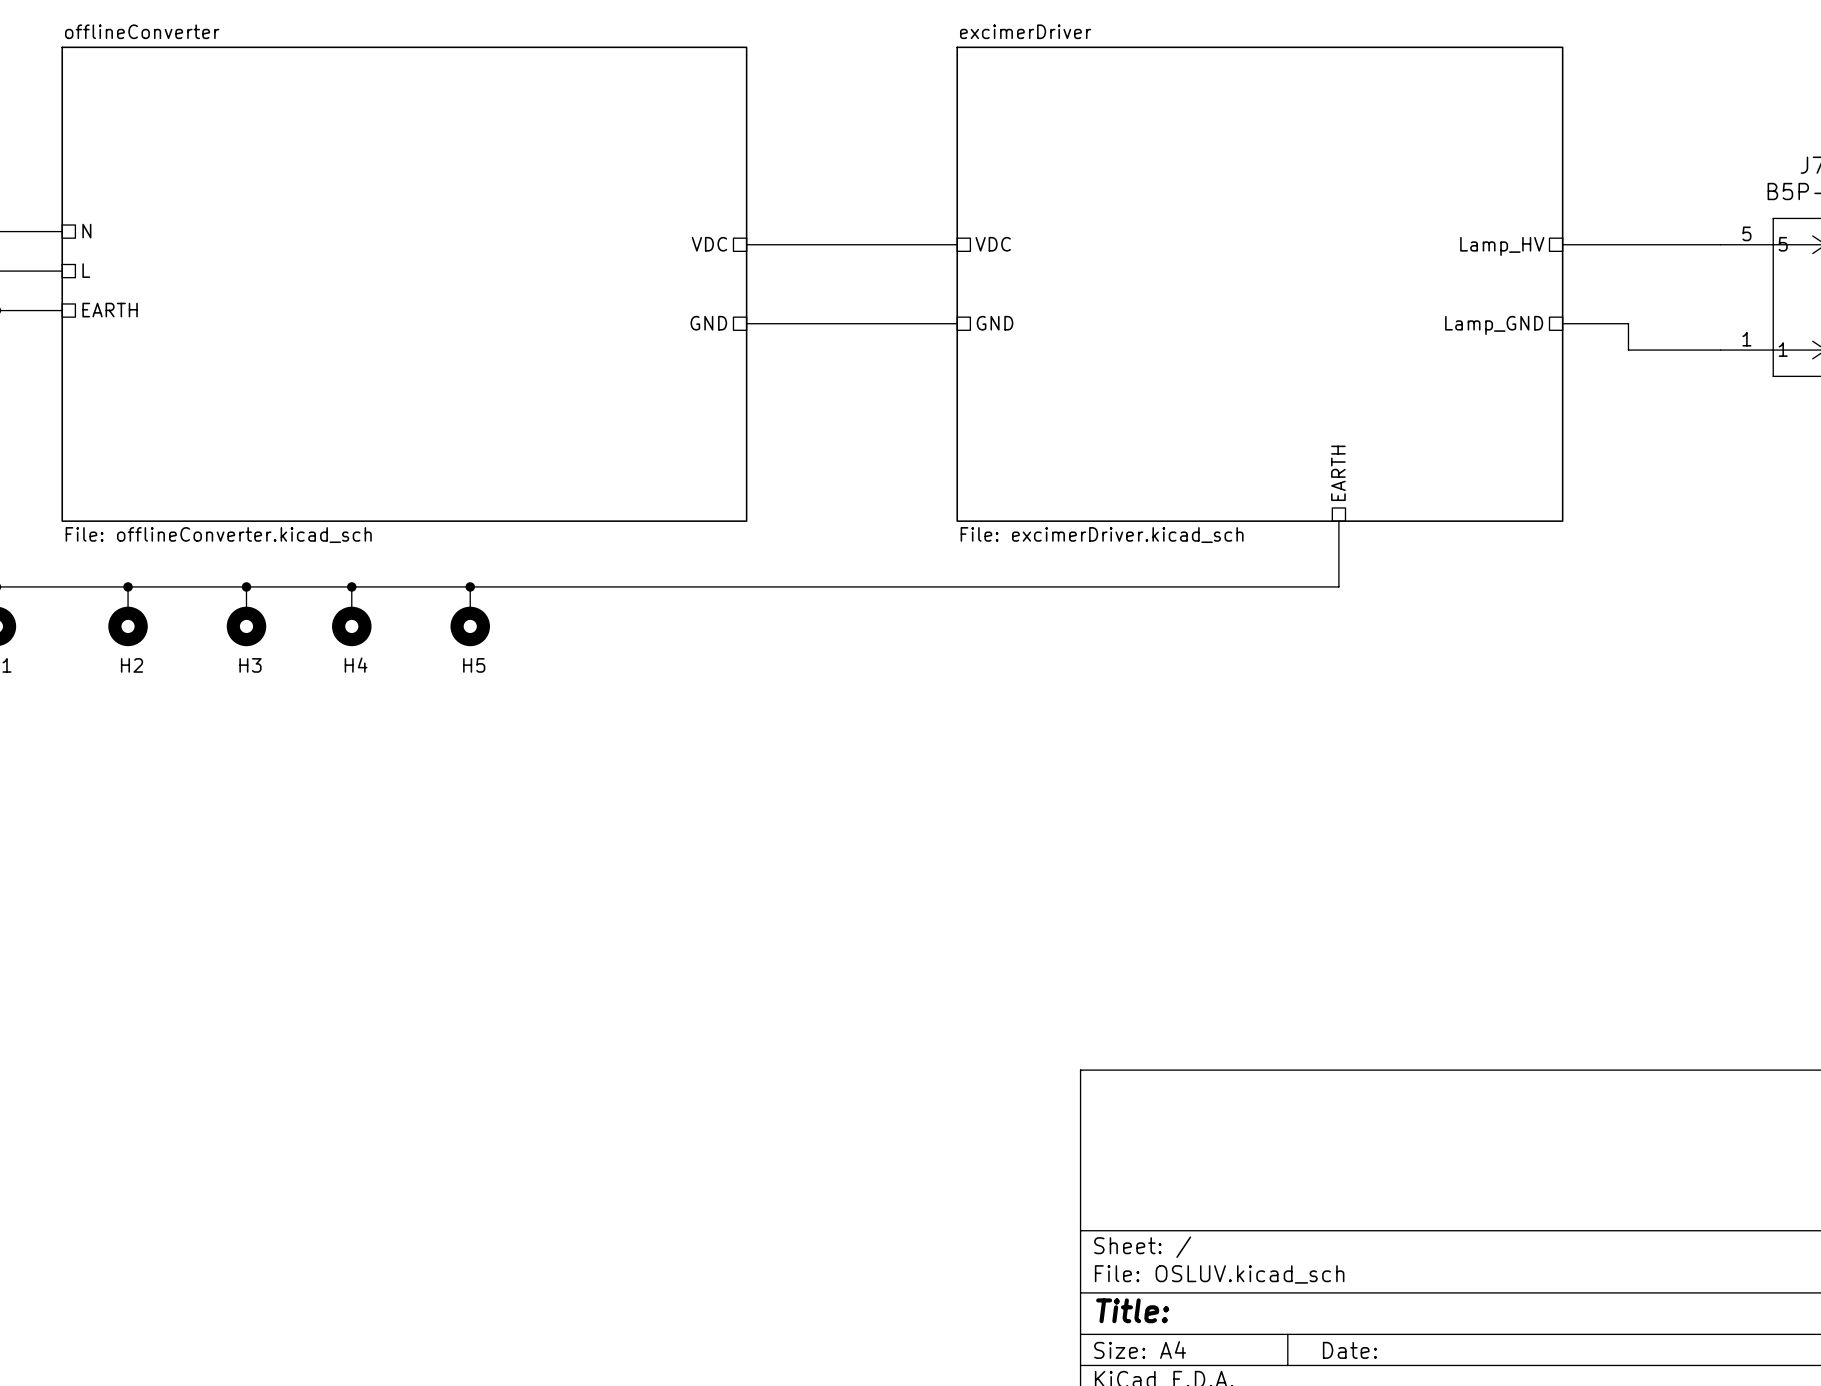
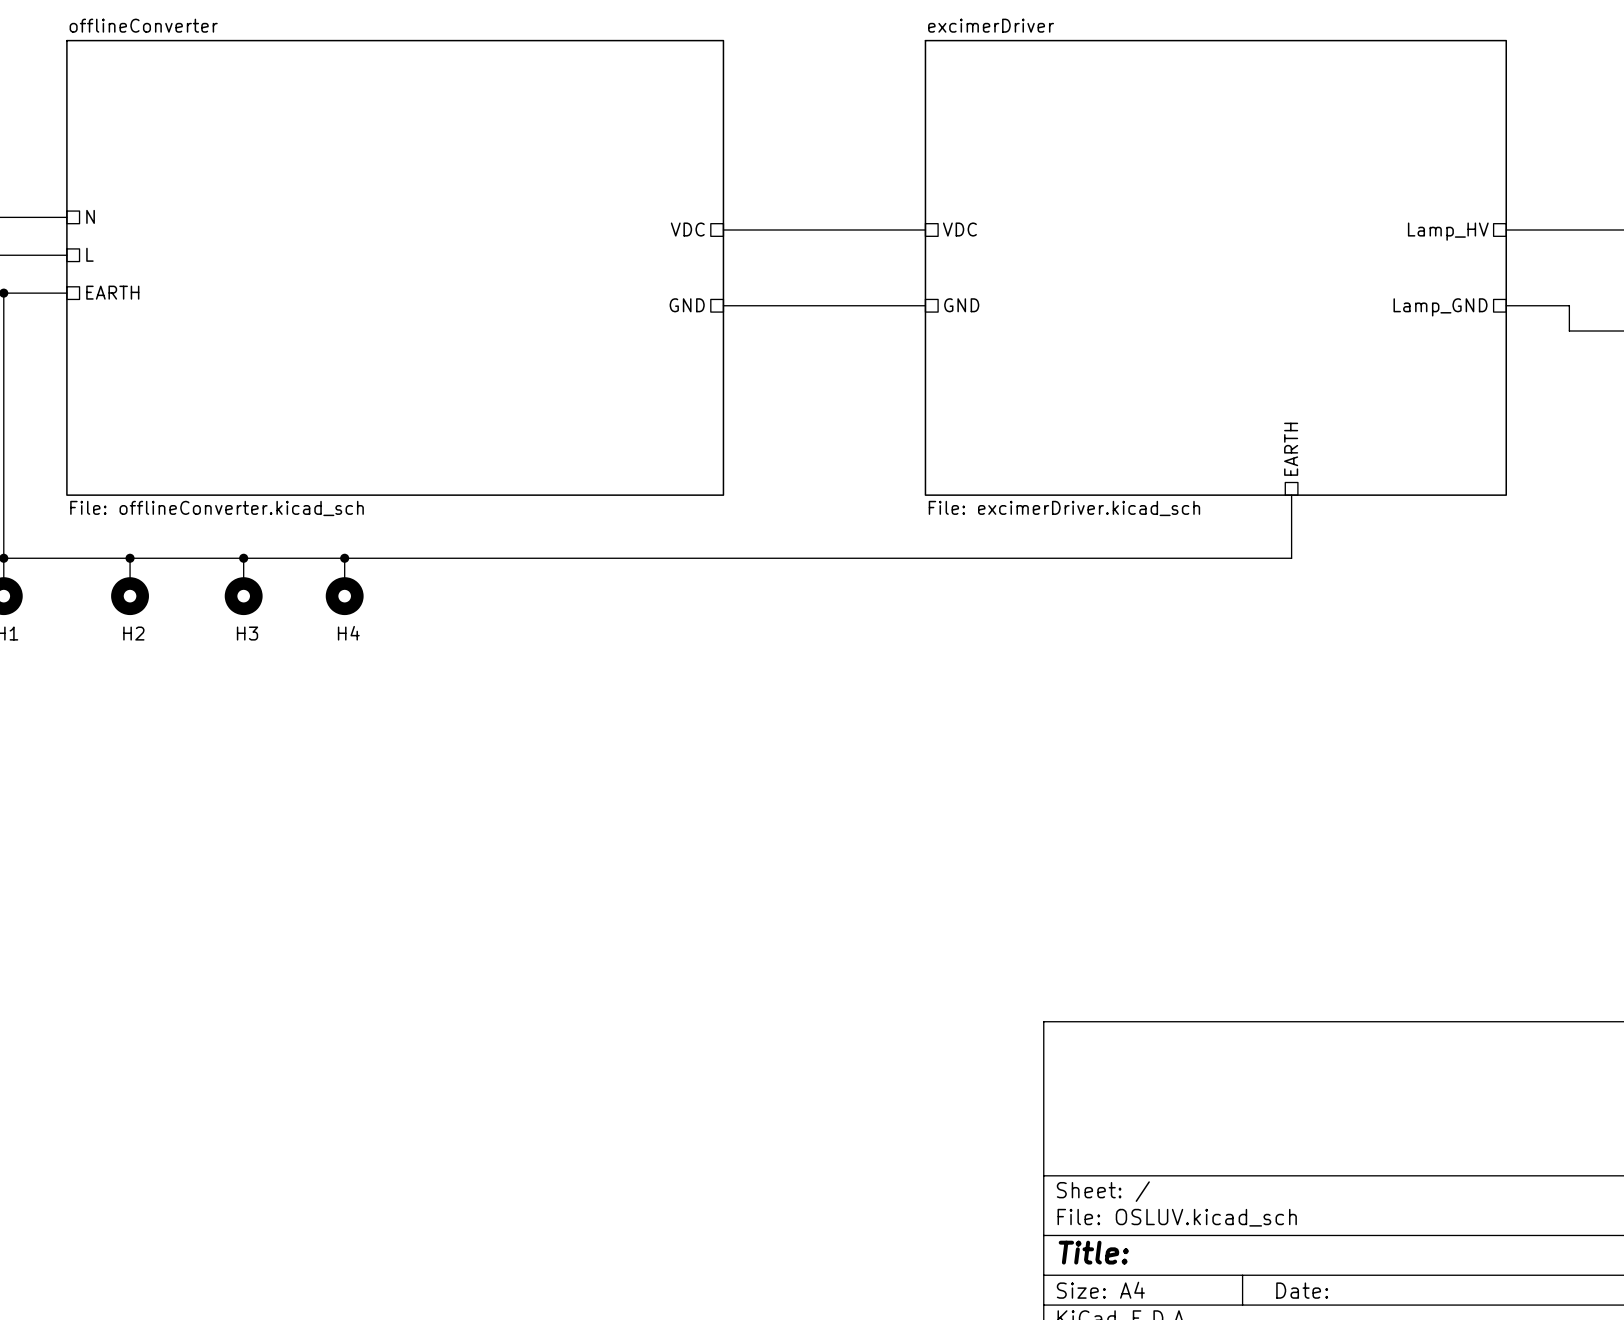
junction: (470, 586) -> none
H5: (470, 616) -> none

